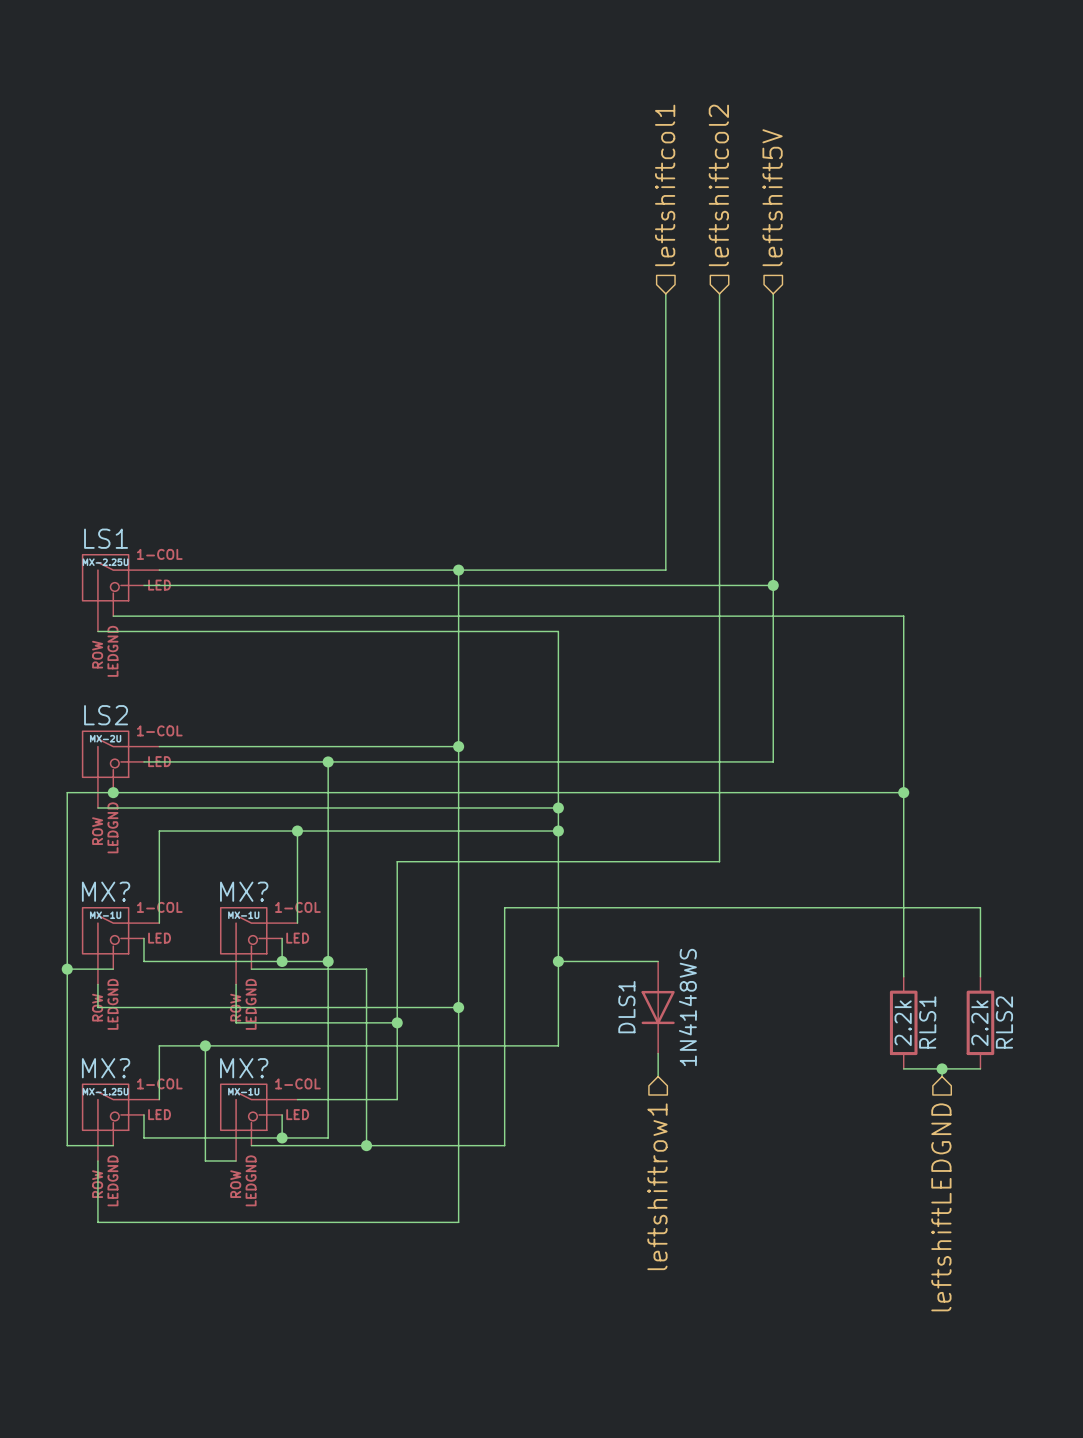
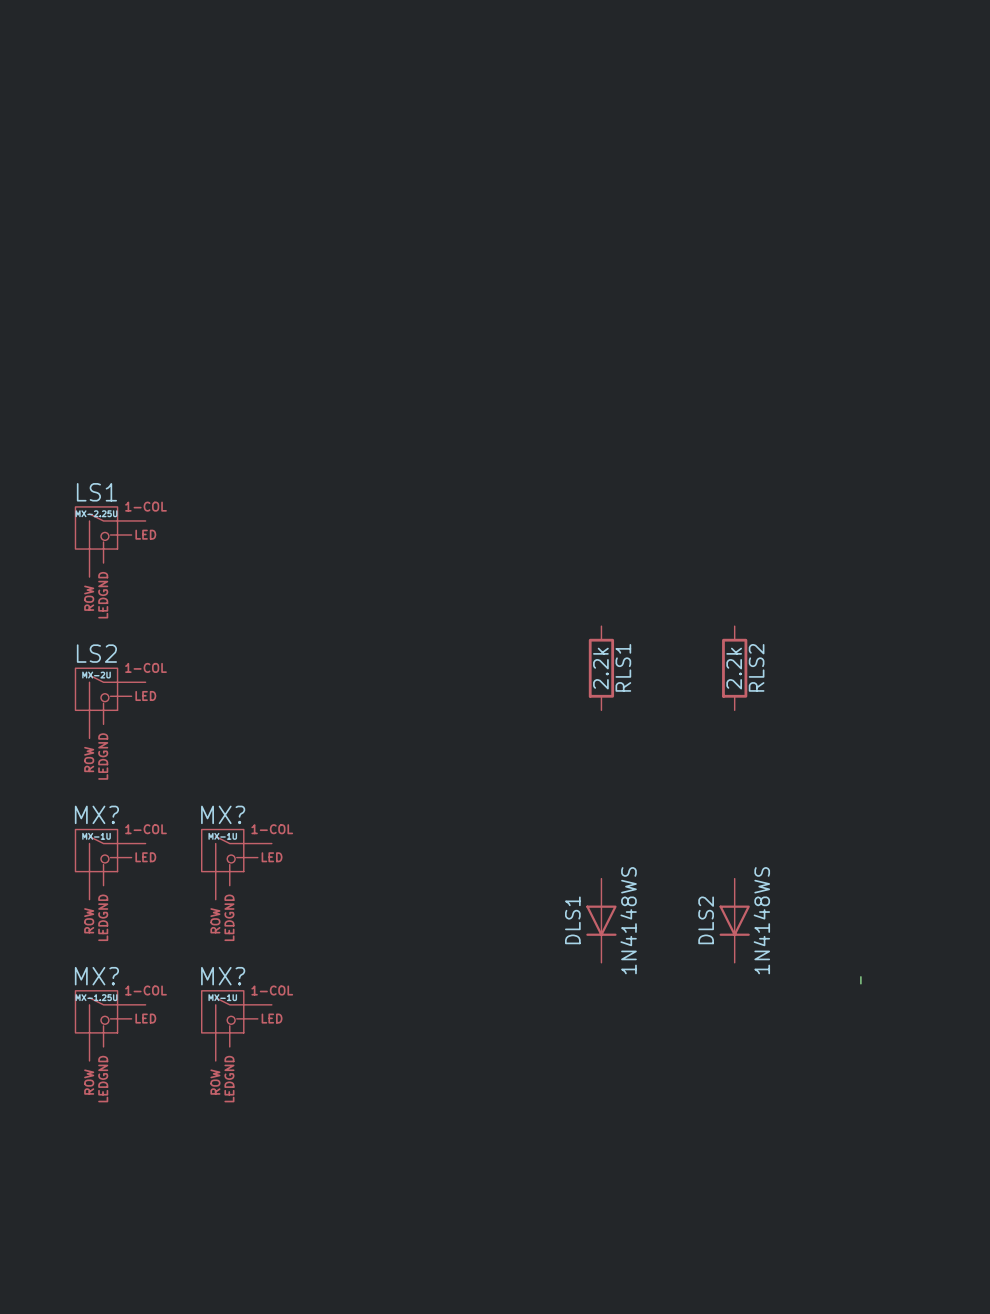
hierarchical label: leftshiftcol1 (665, 185) -> none
hierarchical label: leftshiftcol2 (718, 185) -> none
hierarchical label: leftshift5V (772, 197) -> none
wire: (665, 293) (665, 570) (159, 570) -> none
wire: (719, 293) (719, 861) (397, 861) (397, 1099) (297, 1099) -> none
wire: (773, 293) (773, 761) (143, 761) -> none
wire: (458, 570) (458, 1222) (97, 1222) (97, 1160) -> none
junction: (458, 570) -> none
wire: (143, 585) (773, 585) -> none
junction: (773, 585) -> none
wire: (113, 616) (903, 616) (903, 976) -> none
wire: (97, 631) (558, 631) (558, 1045) (159, 1045) (159, 1099) -> none
wire: (159, 746) (458, 746) -> none
junction: (458, 746) -> none
wire: (328, 761) (328, 1137) (143, 1137) (143, 1114) -> none
junction: (328, 761) -> none
junction: (113, 792) -> none
wire: (903, 792) (67, 792) (67, 1145) (113, 1145) -> none
junction: (903, 792) -> none
wire: (97, 807) (558, 807) -> none
junction: (558, 807) -> none
wire: (297, 831) (297, 923) -> none
junction: (297, 831) -> none
wire: (558, 831) (159, 831) (159, 923) -> none
junction: (558, 831) -> none
wire: (143, 938) (143, 961) (328, 961) -> none
wire: (282, 938) (282, 961) -> none
junction: (282, 961) -> none
junction: (328, 961) -> none
wire: (558, 961) (658, 961) -> none
junction: (558, 961) -> none
wire: (67, 969) (113, 969) -> none
junction: (67, 969) -> none
wire: (251, 969) (366, 969) (366, 1145) -> none
wire: (980, 976) (980, 907) (504, 907) (504, 1145) (251, 1145) -> none
wire: (97, 984) (97, 1007) (458, 1007) -> none
wire: (236, 984) (236, 1022) (397, 1022) -> none
junction: (458, 1007) -> none
DLS2: none -> 1N4148WS (734, 920)
junction: (397, 1022) -> none
RLS1 position: (903, 1022) -> (601, 668)
RLS2 position: (980, 1022) -> (734, 668)
wire: (205, 1045) (205, 1160) (236, 1160) -> none
junction: (205, 1045) -> none
wire: (658, 1053) (658, 1076) -> none
wire: (903, 1068) (980, 1068) -> none
junction: (942, 1068) -> none
wire: (282, 1114) (282, 1137) -> none
junction: (282, 1137) -> none
junction: (366, 1145) -> none
hierarchical label: leftshiftrow1 (657, 1186) -> none
hierarchical label: leftshiftLEDGND (941, 1207) -> none

